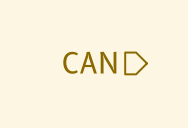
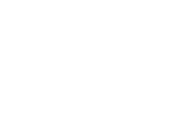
hierarchical label: CAN (89, 62) -> none

